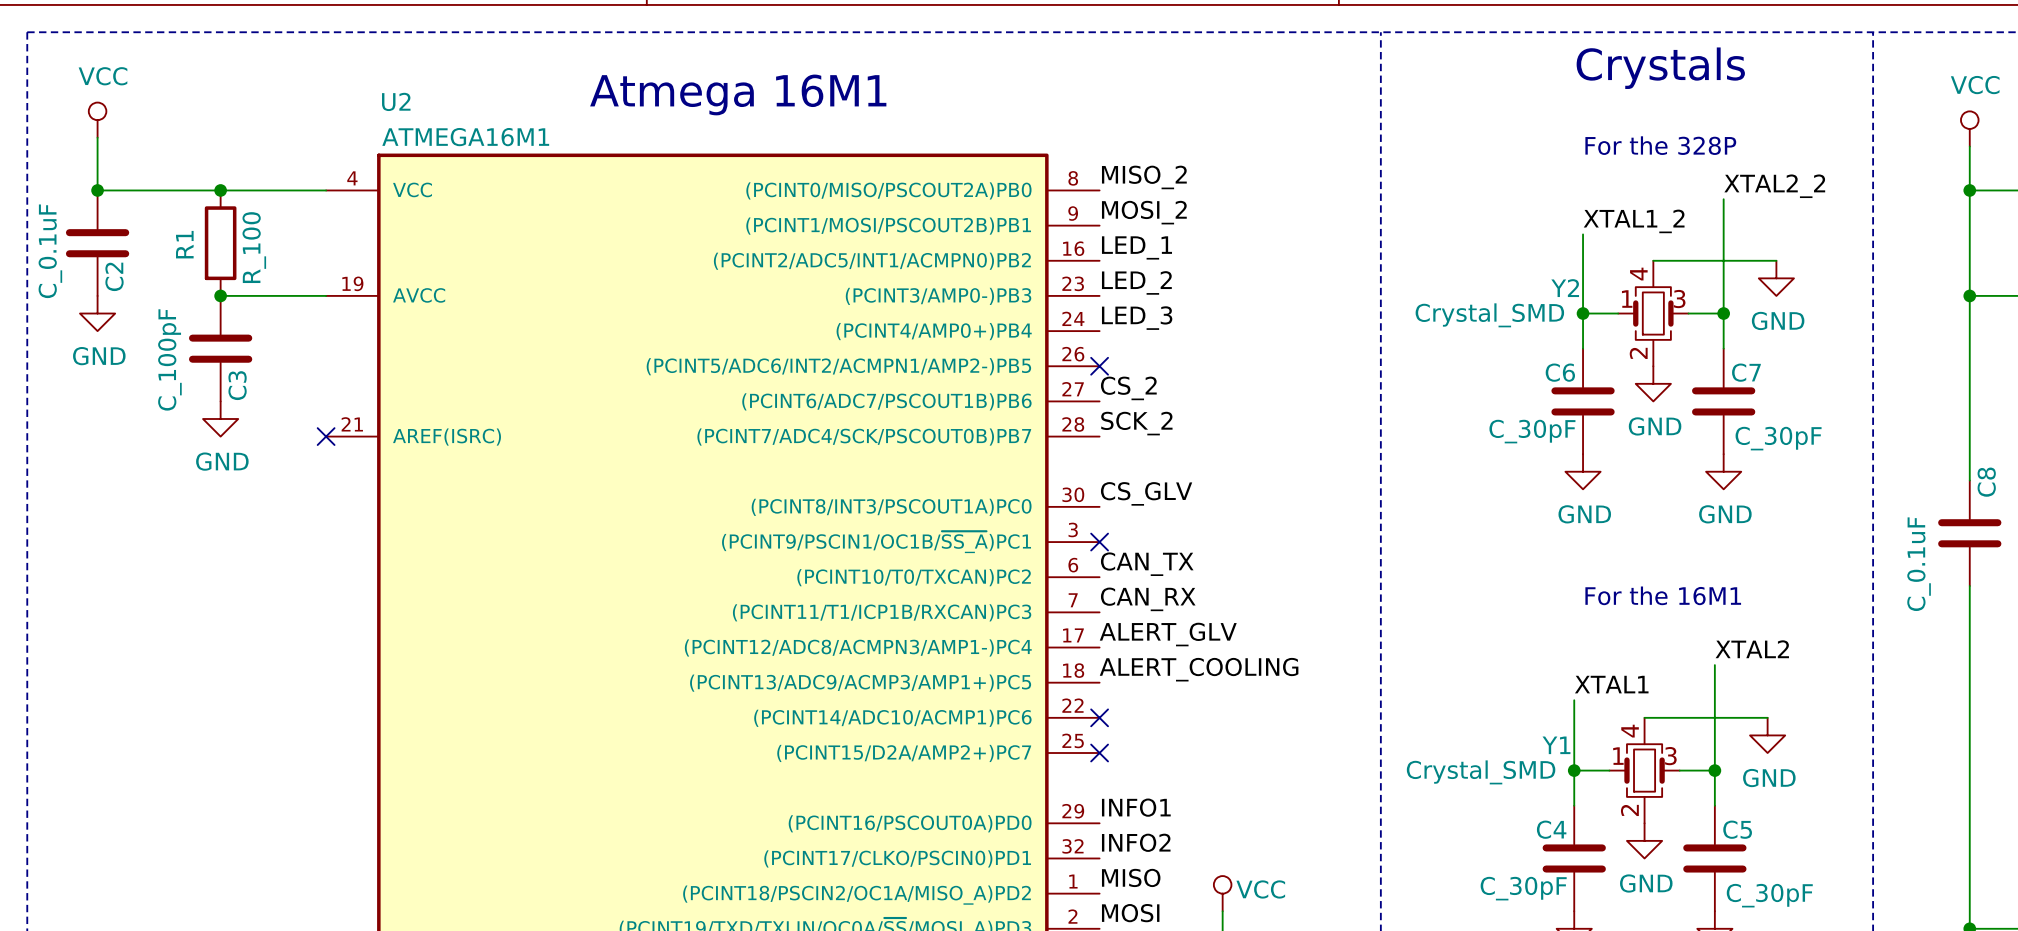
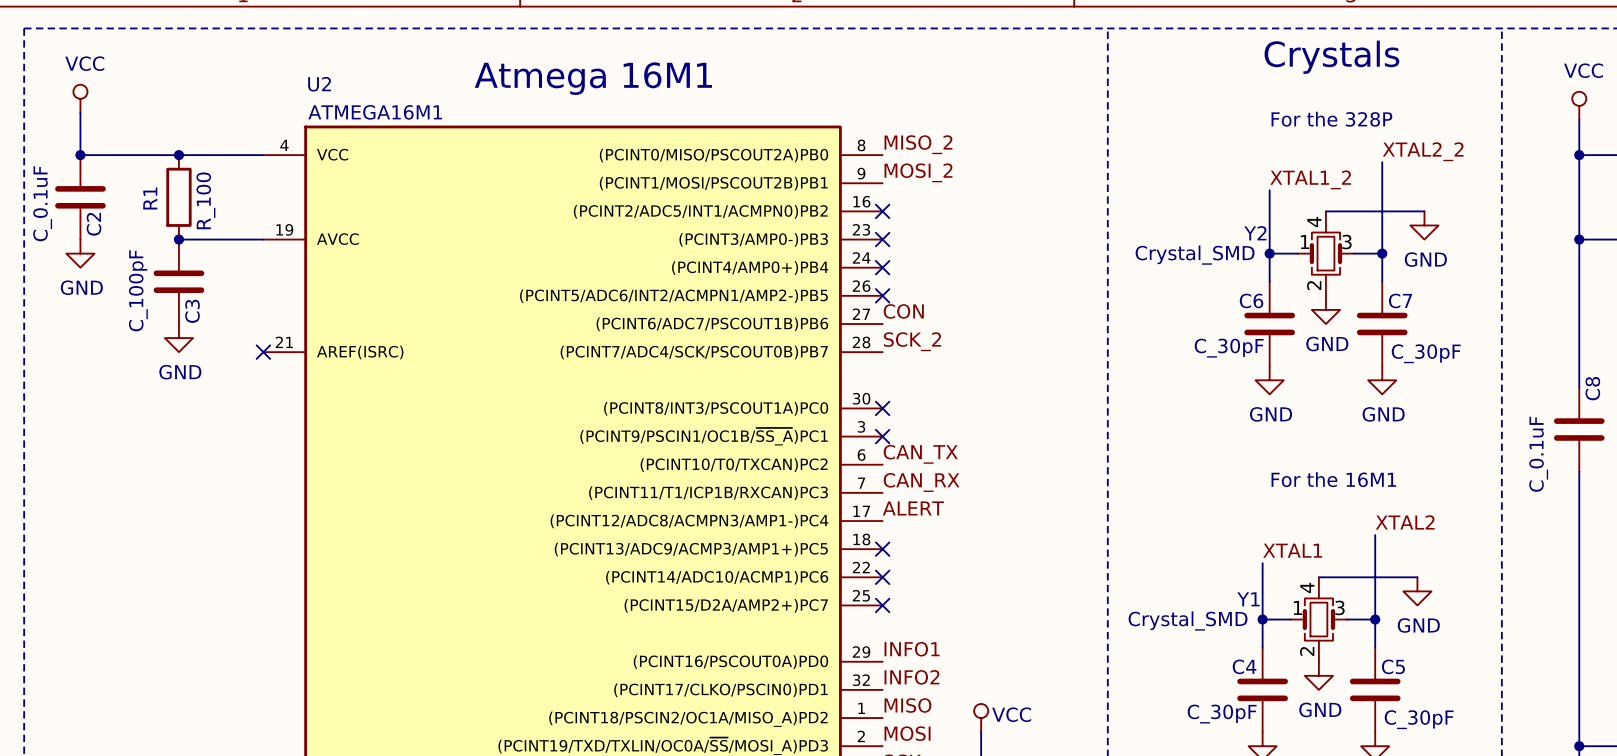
label: LED_1 (1136, 247) -> none
no-connect mark: none -> (882, 211)
label: LED_2 (1136, 282) -> none
no-connect mark: none -> (882, 239)
label: LED_3 (1137, 318) -> none
no-connect mark: none -> (882, 267)
label: CS_2 (1128, 388) -> CON (903, 311)
label: CS_GLV (1146, 493) -> none
no-connect mark: none -> (882, 408)
label: ALERT_GLV (1168, 634) -> ALERT (913, 508)
label: ALERT_COOLING (1199, 669) -> none
no-connect mark: none -> (882, 549)

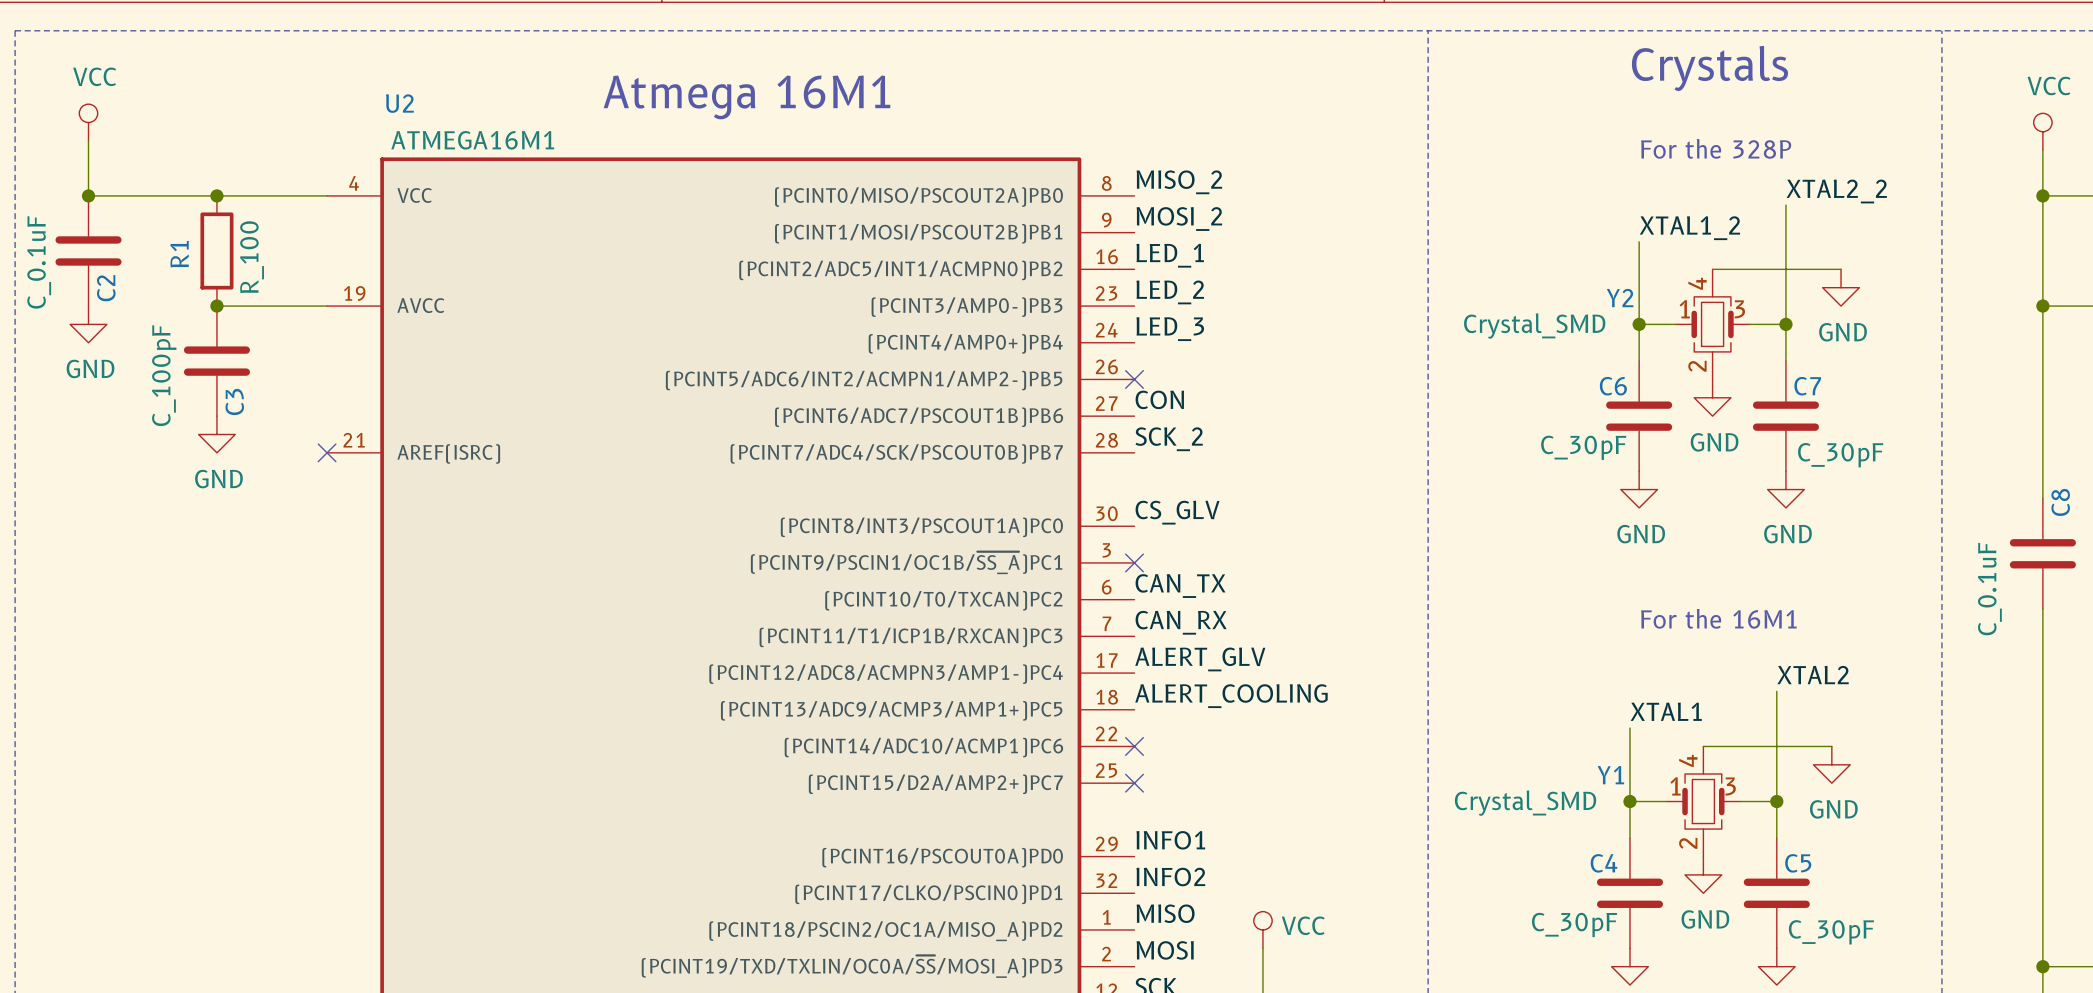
label: none -> LED_1 (1170, 255)
no-connect mark: (882, 211) -> none
label: none -> LED_2 (1170, 292)
no-connect mark: (882, 239) -> none
label: none -> LED_3 (1170, 329)
no-connect mark: (882, 267) -> none
label: none -> CS_GLV (1177, 512)
no-connect mark: (882, 408) -> none
label: ALERT (913, 508) -> ALERT_GLV (1200, 659)
label: none -> ALERT_COOLING (1231, 696)
no-connect mark: (882, 549) -> none

